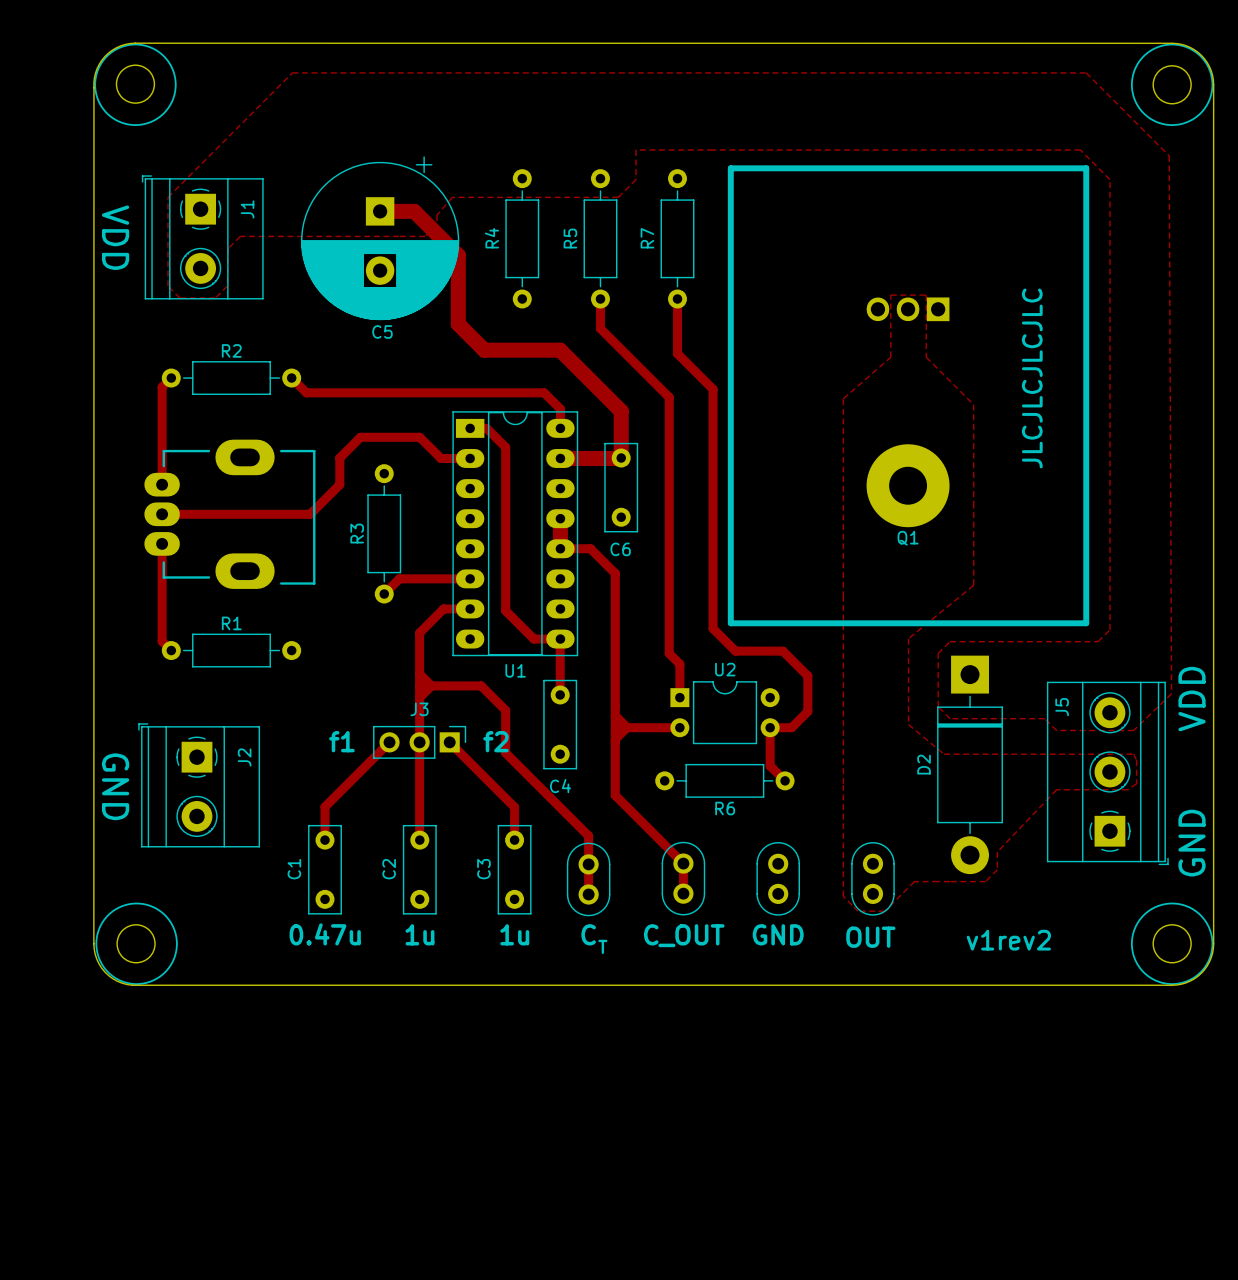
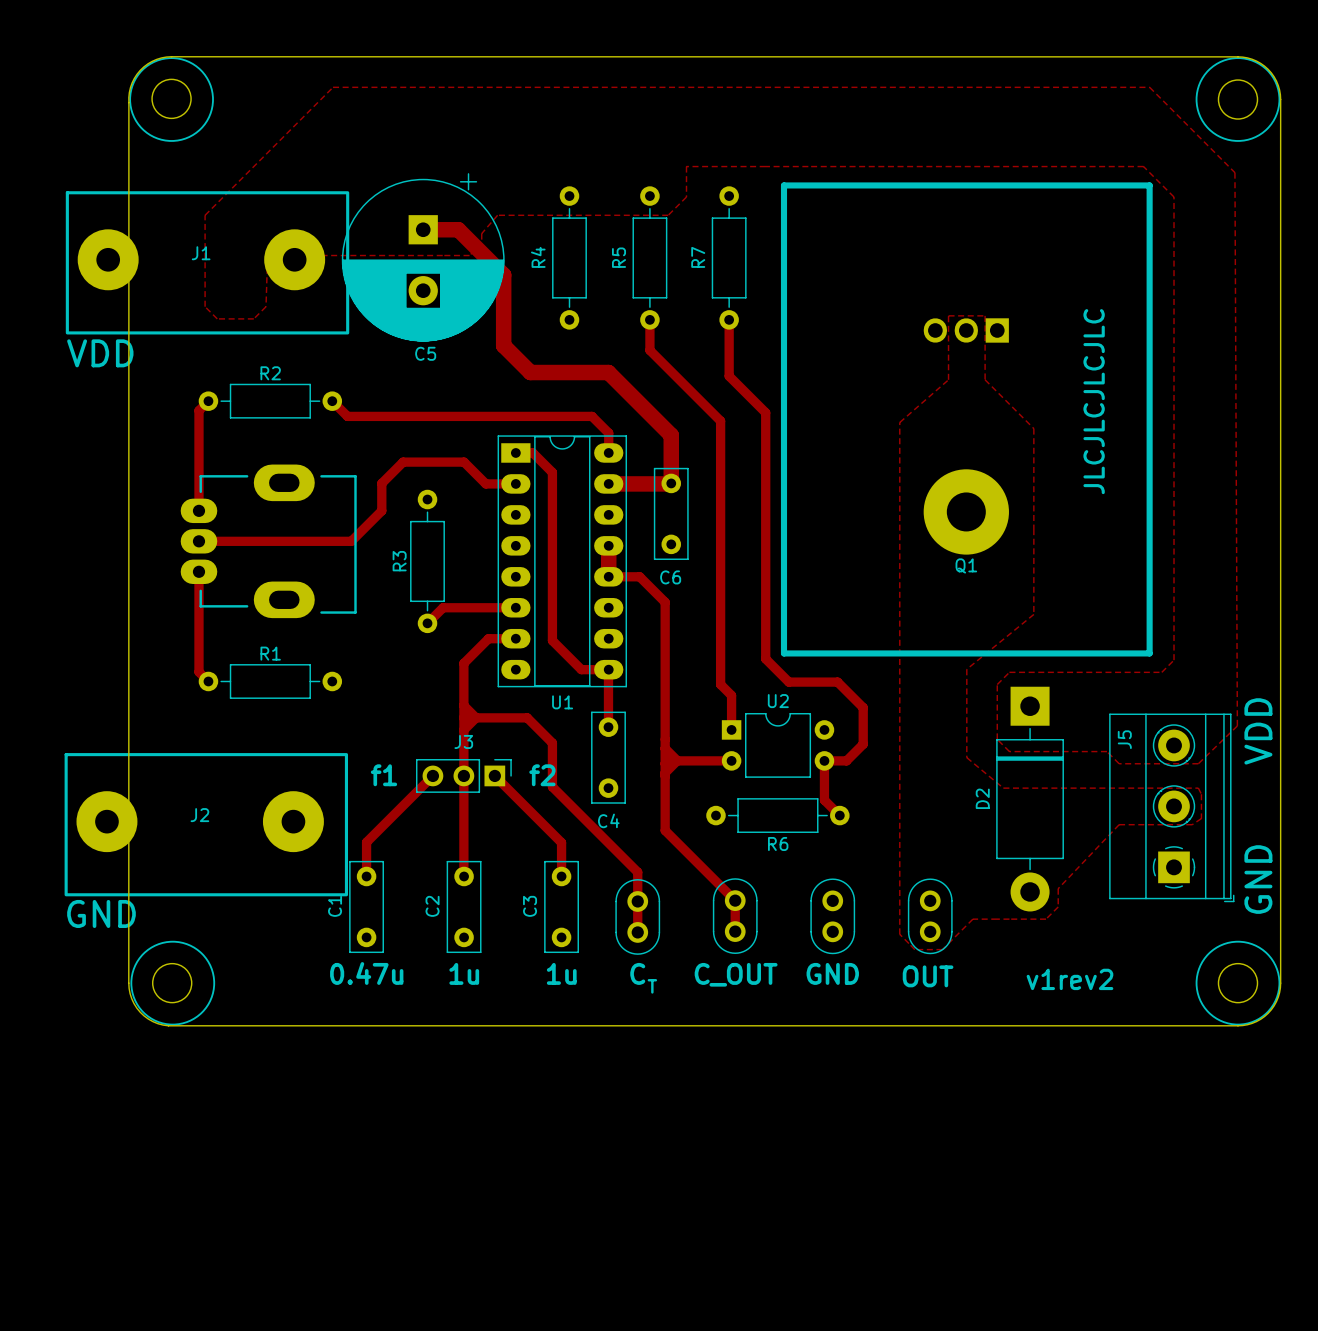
J1 footprint: [141, 175, 264, 300] -> [65, 191, 350, 335]
J1 name position: J1 (247, 209) -> J1 (201, 253)
text rotation: 0° (115, 237) -> 90° counterclockwise (100, 353)
text position: VDD (115, 237) -> VDD (100, 353)
J2 footprint: [138, 723, 261, 848] -> [64, 753, 349, 897]
J2 name position: J2 (244, 757) -> J2 (199, 815)
text rotation: 0° (115, 786) -> 90° counterclockwise (101, 913)
text position: GND (115, 786) -> GND (101, 913)

